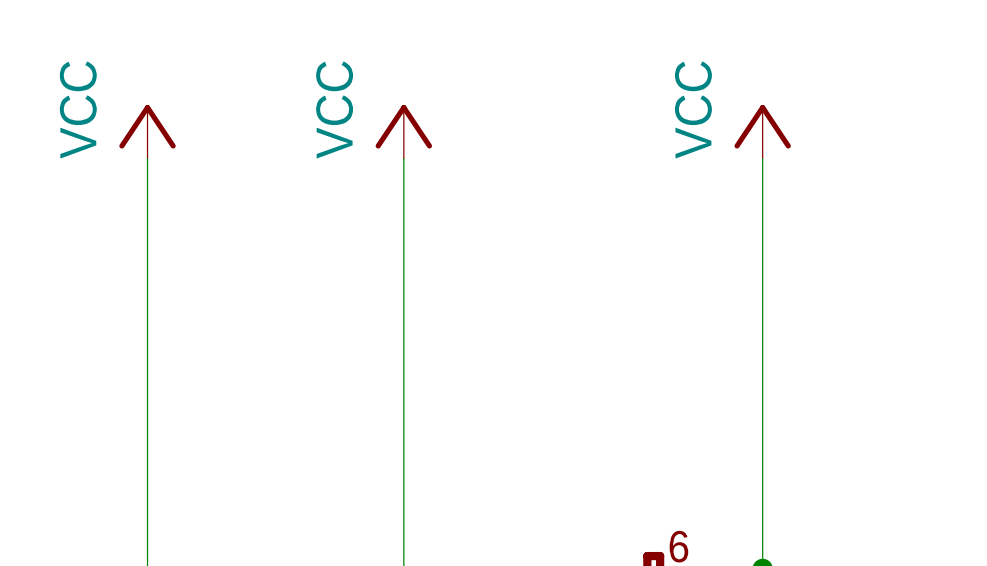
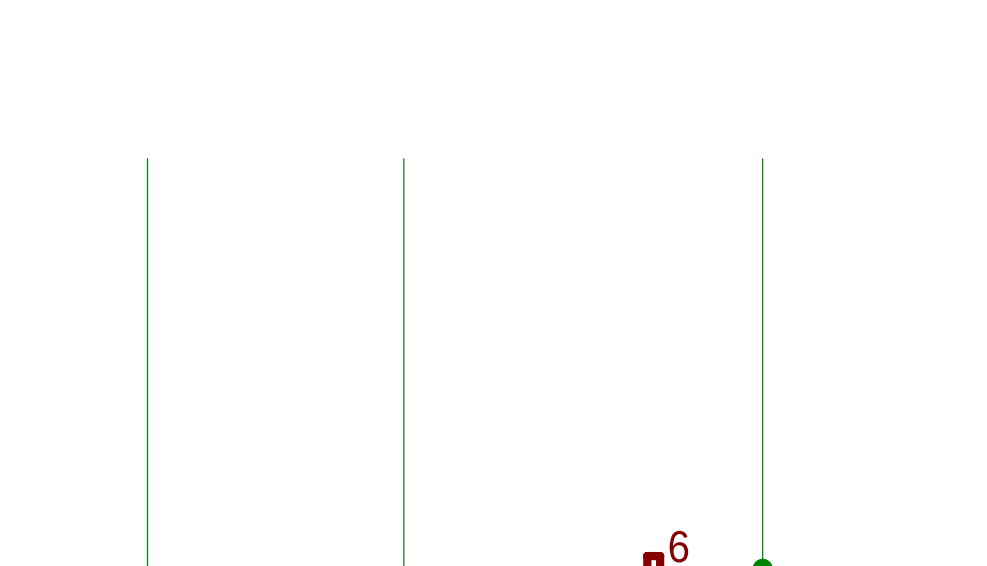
power symbol: VCC (147, 131) -> none
power symbol: VCC (403, 131) -> none
power symbol: VCC (762, 131) -> none

